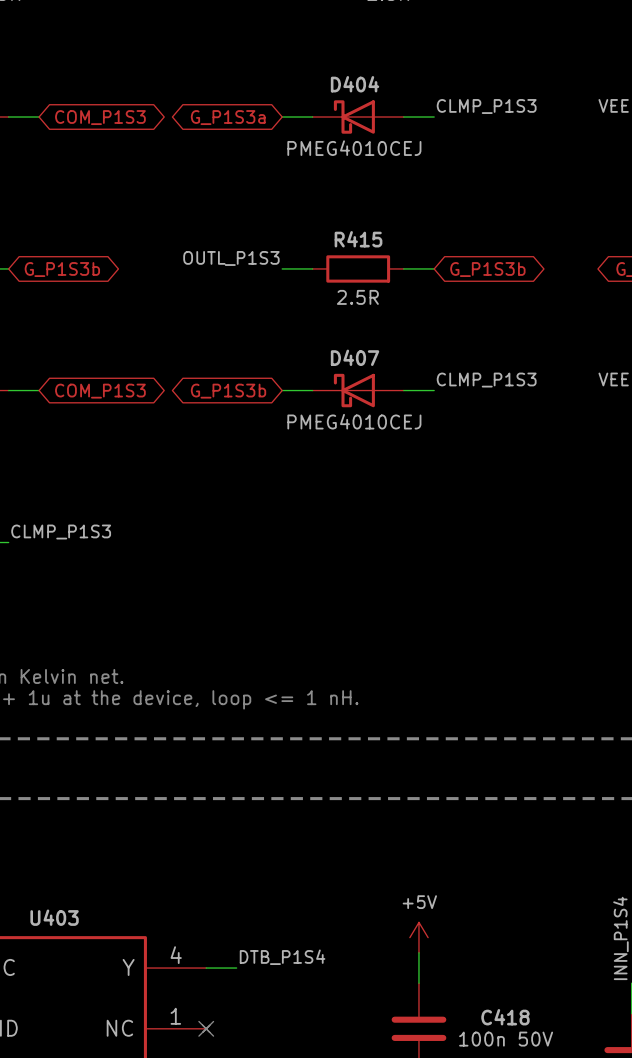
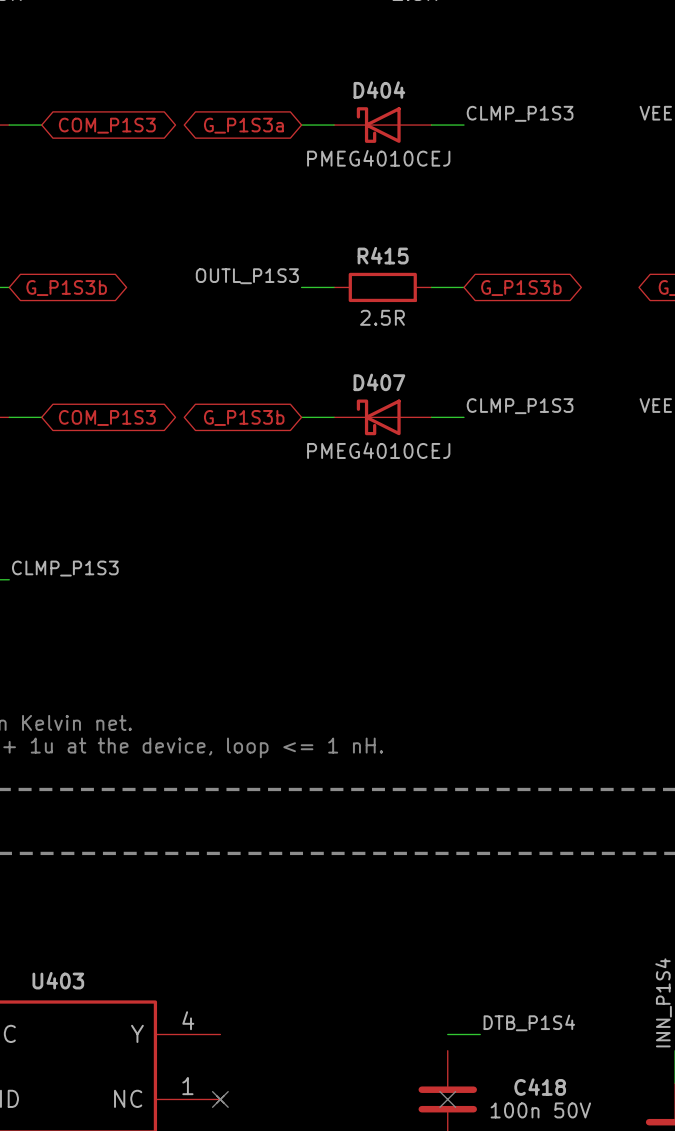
power symbol: +5V (418, 937) -> none
wire: (418, 952) (418, 983) -> none
label position: DTB_P1S4 (282, 957) -> DTB_P1S4 (529, 1022)
wire: (206, 968) (236, 968) -> (447, 1034) (480, 1034)
no-connect mark: none -> (447, 1099)

